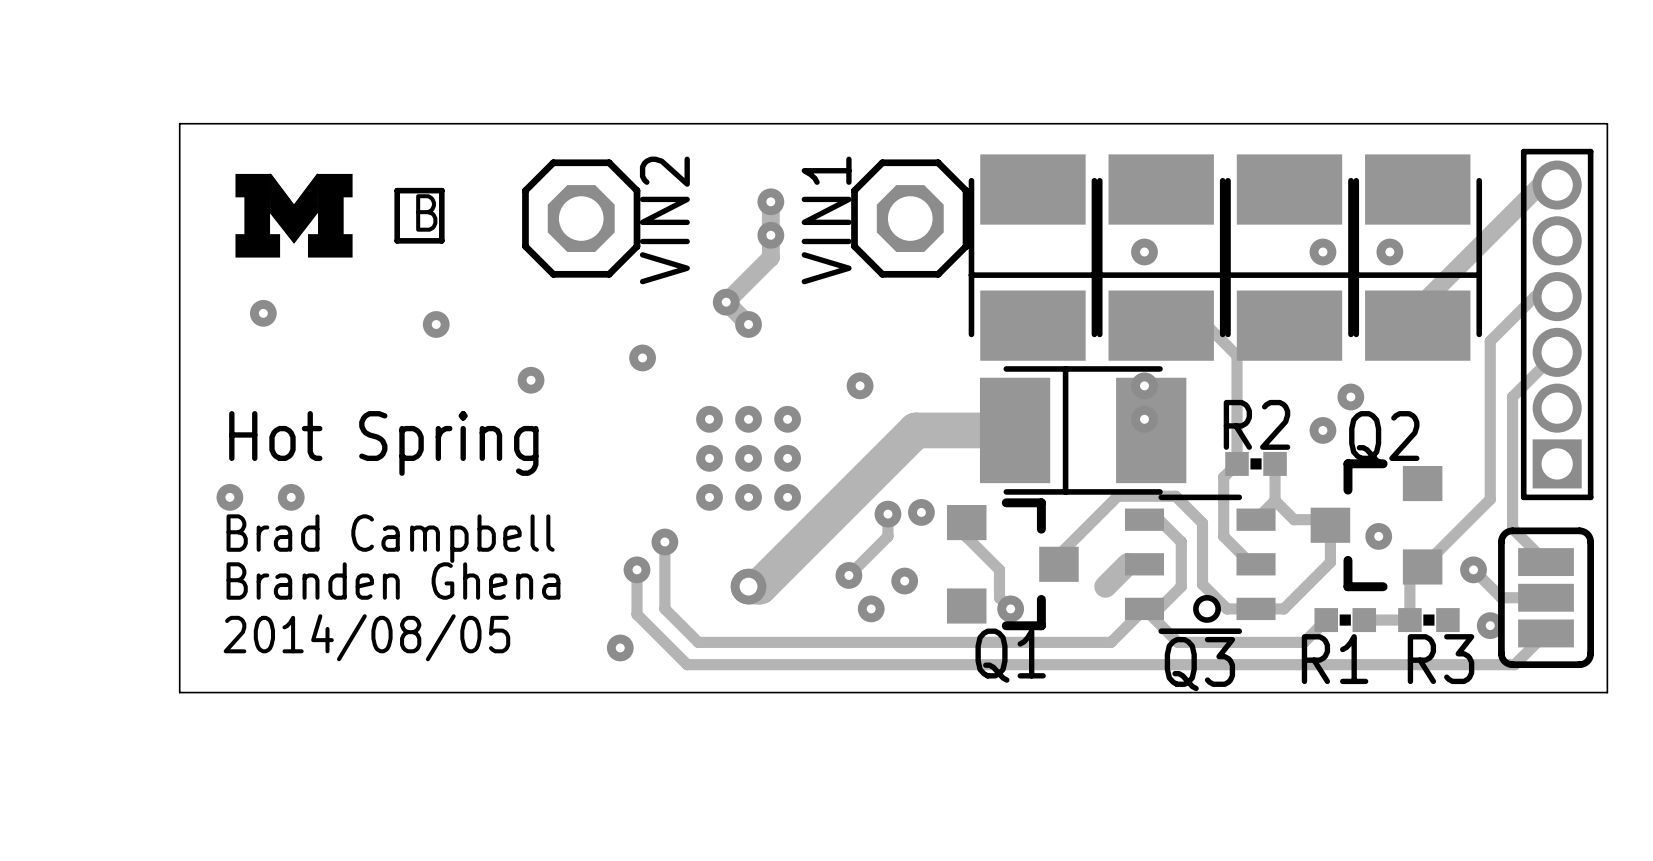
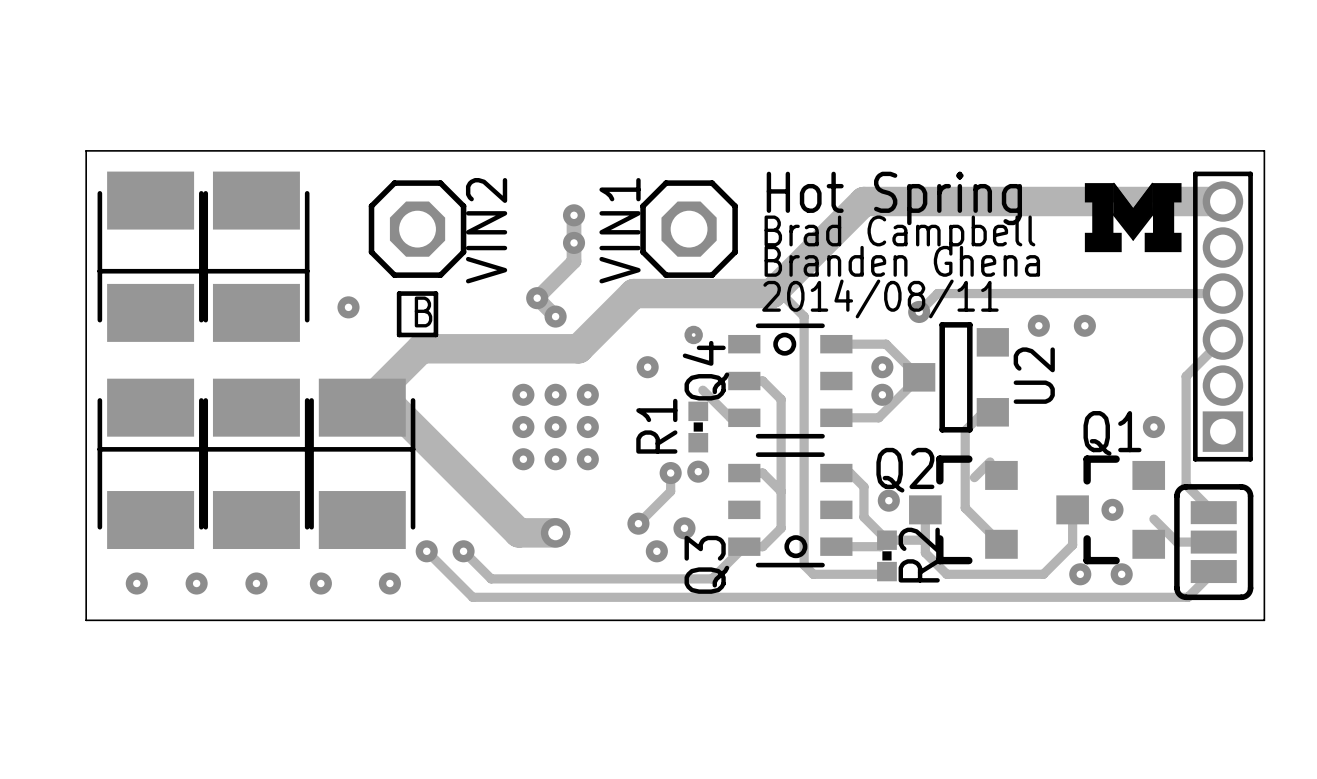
drawing: none -> [1084, 183, 1182, 253]
drawing: [235, 173, 353, 258] -> none
track: (1540, 185) (1417, 307) (1417, 325) -> none
line: (397, 190) (397, 240) (441, 240) (441, 190) (397, 190) -> (399, 293) (399, 334) (435, 334) (435, 293) (399, 293)
text position: B (426, 212) -> B (423, 311)
part: none -> (150, 256)
part: none -> (256, 256)
via: (1144, 251) -> none
via: (1322, 251) -> none
via: (1389, 251) -> none
part: (1032, 257) -> none
part: (1161, 257) -> none
part: (1289, 257) -> none
part: (1417, 257) -> none
track: none -> (776, 288) (804, 316) (804, 565) (813, 574) (884, 574) (886, 571)
track: (1534, 296) (1490, 341) (1490, 499) (1409, 579) (1409, 620) (1364, 620) -> (1204, 293) (937, 293) (919, 311)
text: none -> 2014/08/11 (880, 298)
via: (263, 313) -> none
via: none -> (348, 307)
via: none -> (919, 311)
via: (436, 324) -> none
track: (1161, 325) (1206, 325) (1237, 355) (1237, 463) (1223, 477) (1223, 536) (1251, 564) (1256, 564) -> none
via: none -> (1038, 325)
via: none -> (1084, 325)
via: none -> (693, 334)
via: (642, 357) -> none
track: none -> (836, 344) (886, 344) (919, 377) (878, 417) (836, 417)
via: (531, 380) -> none
via: (1350, 396) -> none
U2: none -> (956, 377)
Q4: none -> (790, 381)
track: none -> (702, 390) (730, 417) (744, 417)
track: (1015, 430) (915, 430) (759, 586) (748, 586) -> (1209, 201) (863, 201) (771, 293) (633, 293) (578, 348) (421, 348) (362, 407) (393, 407) (518, 532) (555, 532)
part: (1083, 430) -> none
via: (1322, 430) -> none
Q2 name position: Q2 (1384, 438) -> Q2 (905, 470)
track: none -> (992, 412) (981, 414) (965, 430) (965, 508) (1001, 544)
text position: Hot Spring (383, 443) -> Hot Spring (894, 198)
via: none -> (1153, 427)
R2 rotation: 0° (1256, 463) -> 90° clockwise (886, 555)
R2 position: (1256, 463) -> (886, 555)
track: (1275, 463) (1275, 500) (1294, 519) (1324, 519) (1330, 525) (1330, 562) (1283, 608) (1227, 608) (1202, 584) (1202, 523) (1175, 496) (1117, 496) (1058, 555) (1058, 564) -> none
via: (229, 497) -> none
via: (291, 497) -> none
part: none -> (150, 463)
part: none -> (256, 463)
part: none -> (362, 463)
track: none -> (744, 473) (762, 473) (781, 491)
track: none -> (836, 473) (850, 473) (863, 486) (863, 517) (886, 540)
track: (1144, 519) (1158, 519) (1181, 541) (1181, 586) (1158, 608) (1144, 608) -> none
track: (966, 522) (966, 537) (999, 569) (999, 597) (1010, 608) -> none
Q2 position: (1376, 525) -> (963, 509)
via: (1378, 536) -> none
text position: Brad Campbell (390, 538) -> Brad Campbell (899, 235)
track: (664, 541) (664, 608) (698, 642) -> (463, 551) (491, 578) (514, 578)
via: (664, 541) -> none
via: none -> (888, 500)
track: none -> (925, 509) (925, 552) (946, 574) (1043, 574) (1072, 545) (1072, 509)
via: none -> (1112, 509)
Q1 rotation: 0° (1012, 564) -> 180° (1110, 509)
Q1 position: (1012, 564) -> (1110, 509)
track: (1144, 564) (1127, 564) (1105, 586) -> none
Q3 position: (1200, 564) -> (790, 509)
track: (637, 569) (637, 614) (687, 664) -> (426, 551) (472, 597) (504, 597)
via: (637, 569) -> none
via: (1473, 569) -> none
text position: Branden Ghena (393, 581) -> Branden Ghena (902, 261)
track: none -> (886, 540) (880, 546) (836, 546)
track: none -> (886, 540) (923, 540) (925, 542)
via: none -> (426, 551)
via: none -> (463, 551)
via: (1010, 608) -> none
track: (1144, 608) (1111, 642) (938, 642) -> (744, 381) (762, 381) (781, 399) (781, 528) (762, 546) (744, 546) (712, 578)
track: (1144, 608) (1177, 642) (1303, 642) (1326, 620) -> none
R1 rotation: 0° (1345, 620) -> 90° clockwise (698, 427)
R1 position: (1345, 620) -> (698, 427)
R3: (1428, 620) -> none
via: (1490, 625) -> none
via: none -> (1080, 574)
via: none -> (1121, 574)
text: 2014/08/05 (366, 637) -> none
via: none -> (136, 583)
via: none -> (196, 583)
via: none -> (256, 583)
via: none -> (320, 583)
via: none -> (389, 583)
via: (620, 647) -> none
Q3 name rotation: 0° (1199, 664) -> 90° counterclockwise (706, 564)
Q3 name position: Q3 (1199, 664) -> Q3 (706, 564)

